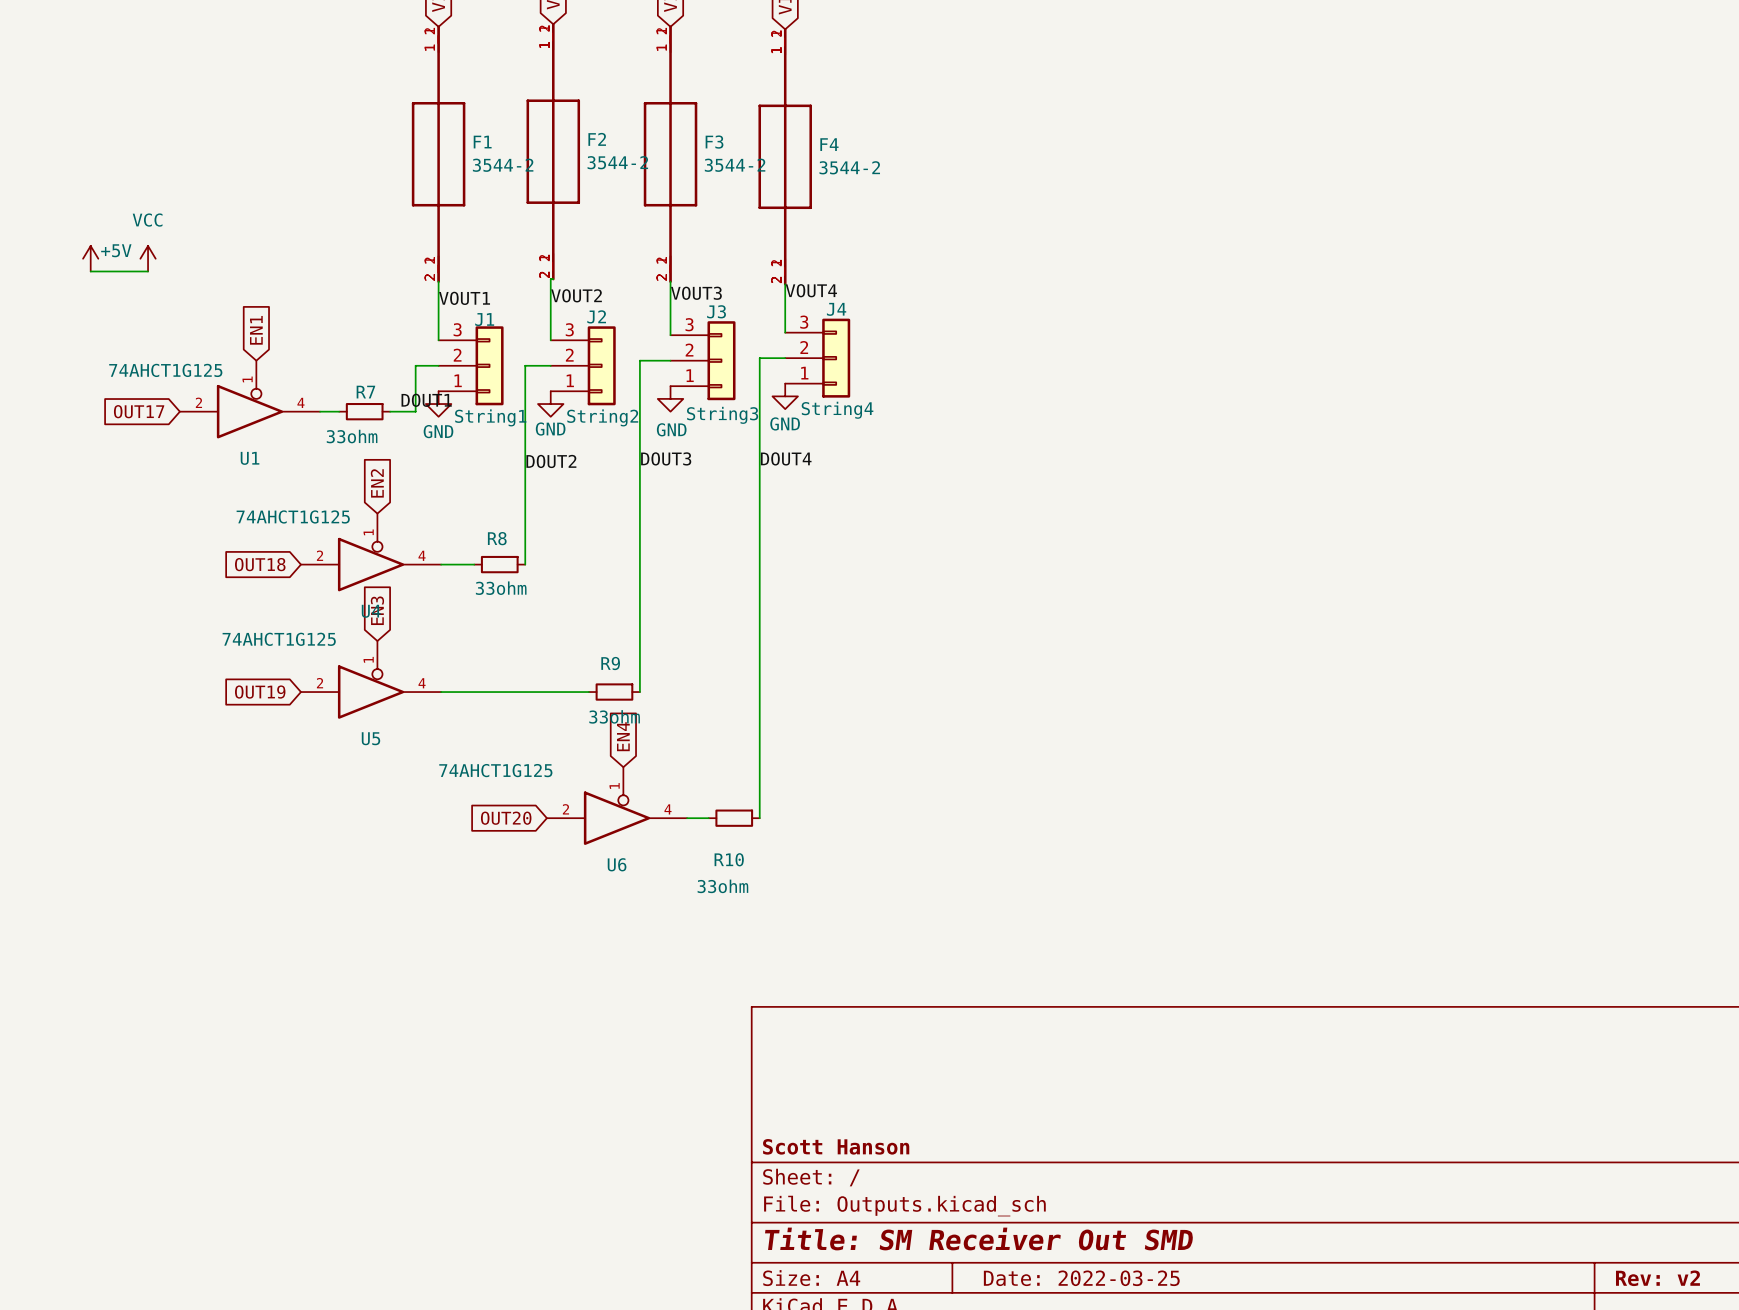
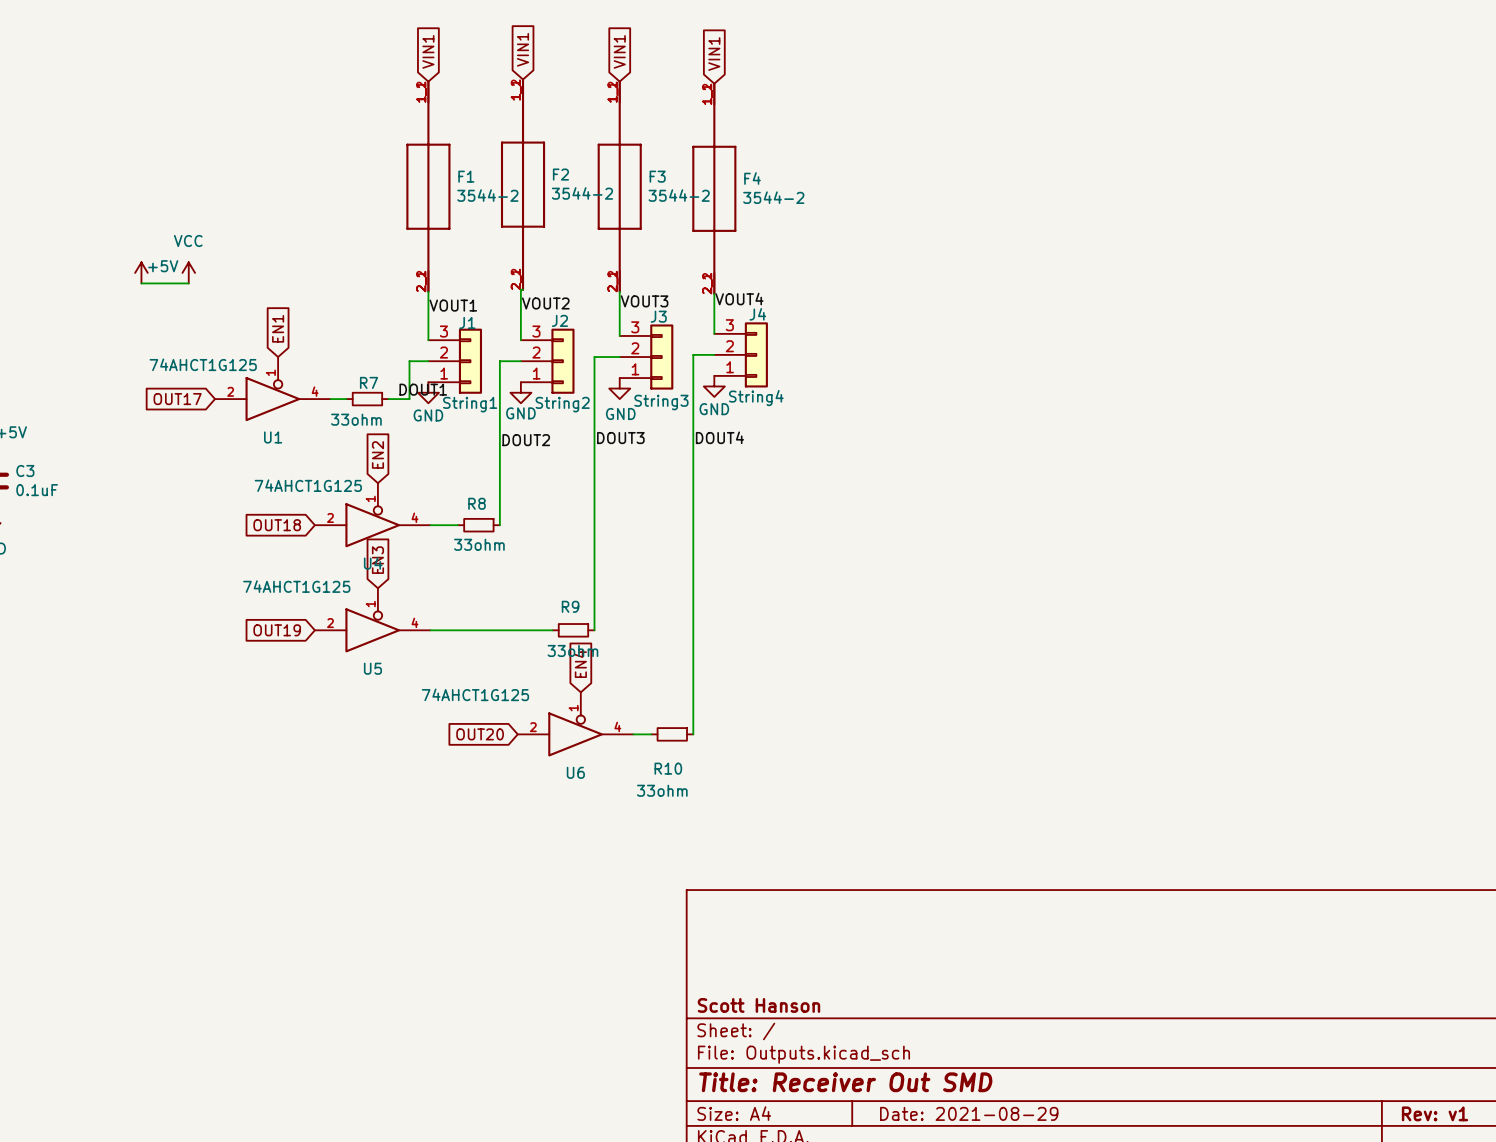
title block: Title: SM Receiver Out SMD (979, 1238) -> Title: Receiver Out SMD (845, 1082)
title block: Date: 2022-03-25 (1081, 1278) -> Date: 2021-08-29 (969, 1113)
title block: Rev: v2 (1657, 1278) -> Rev: v1 (1435, 1113)

